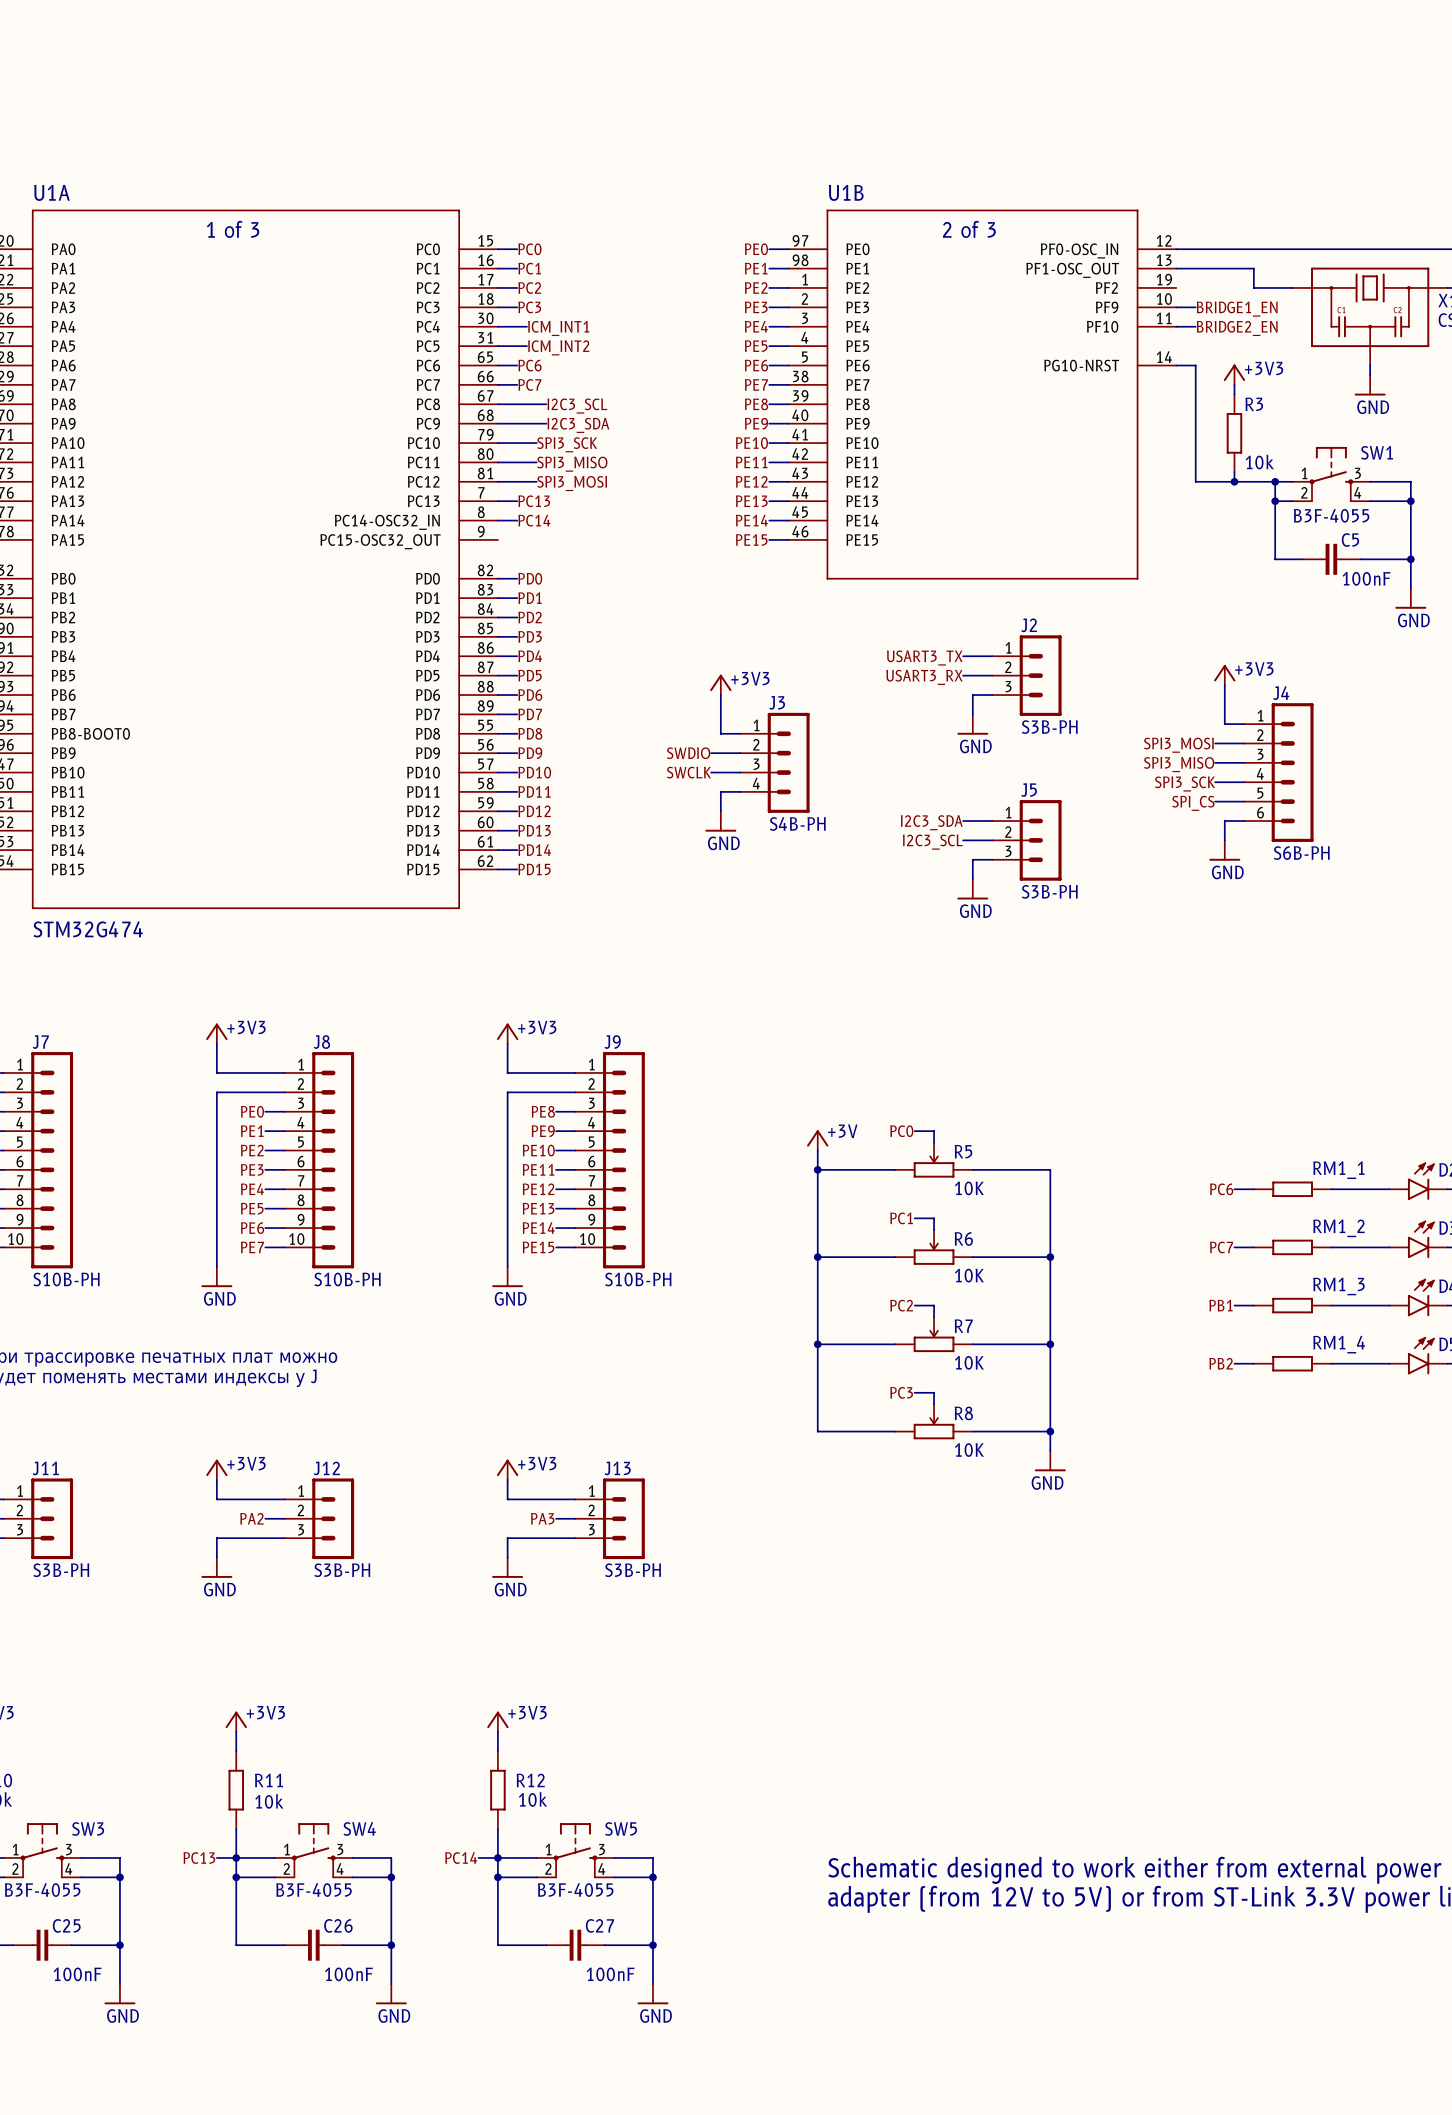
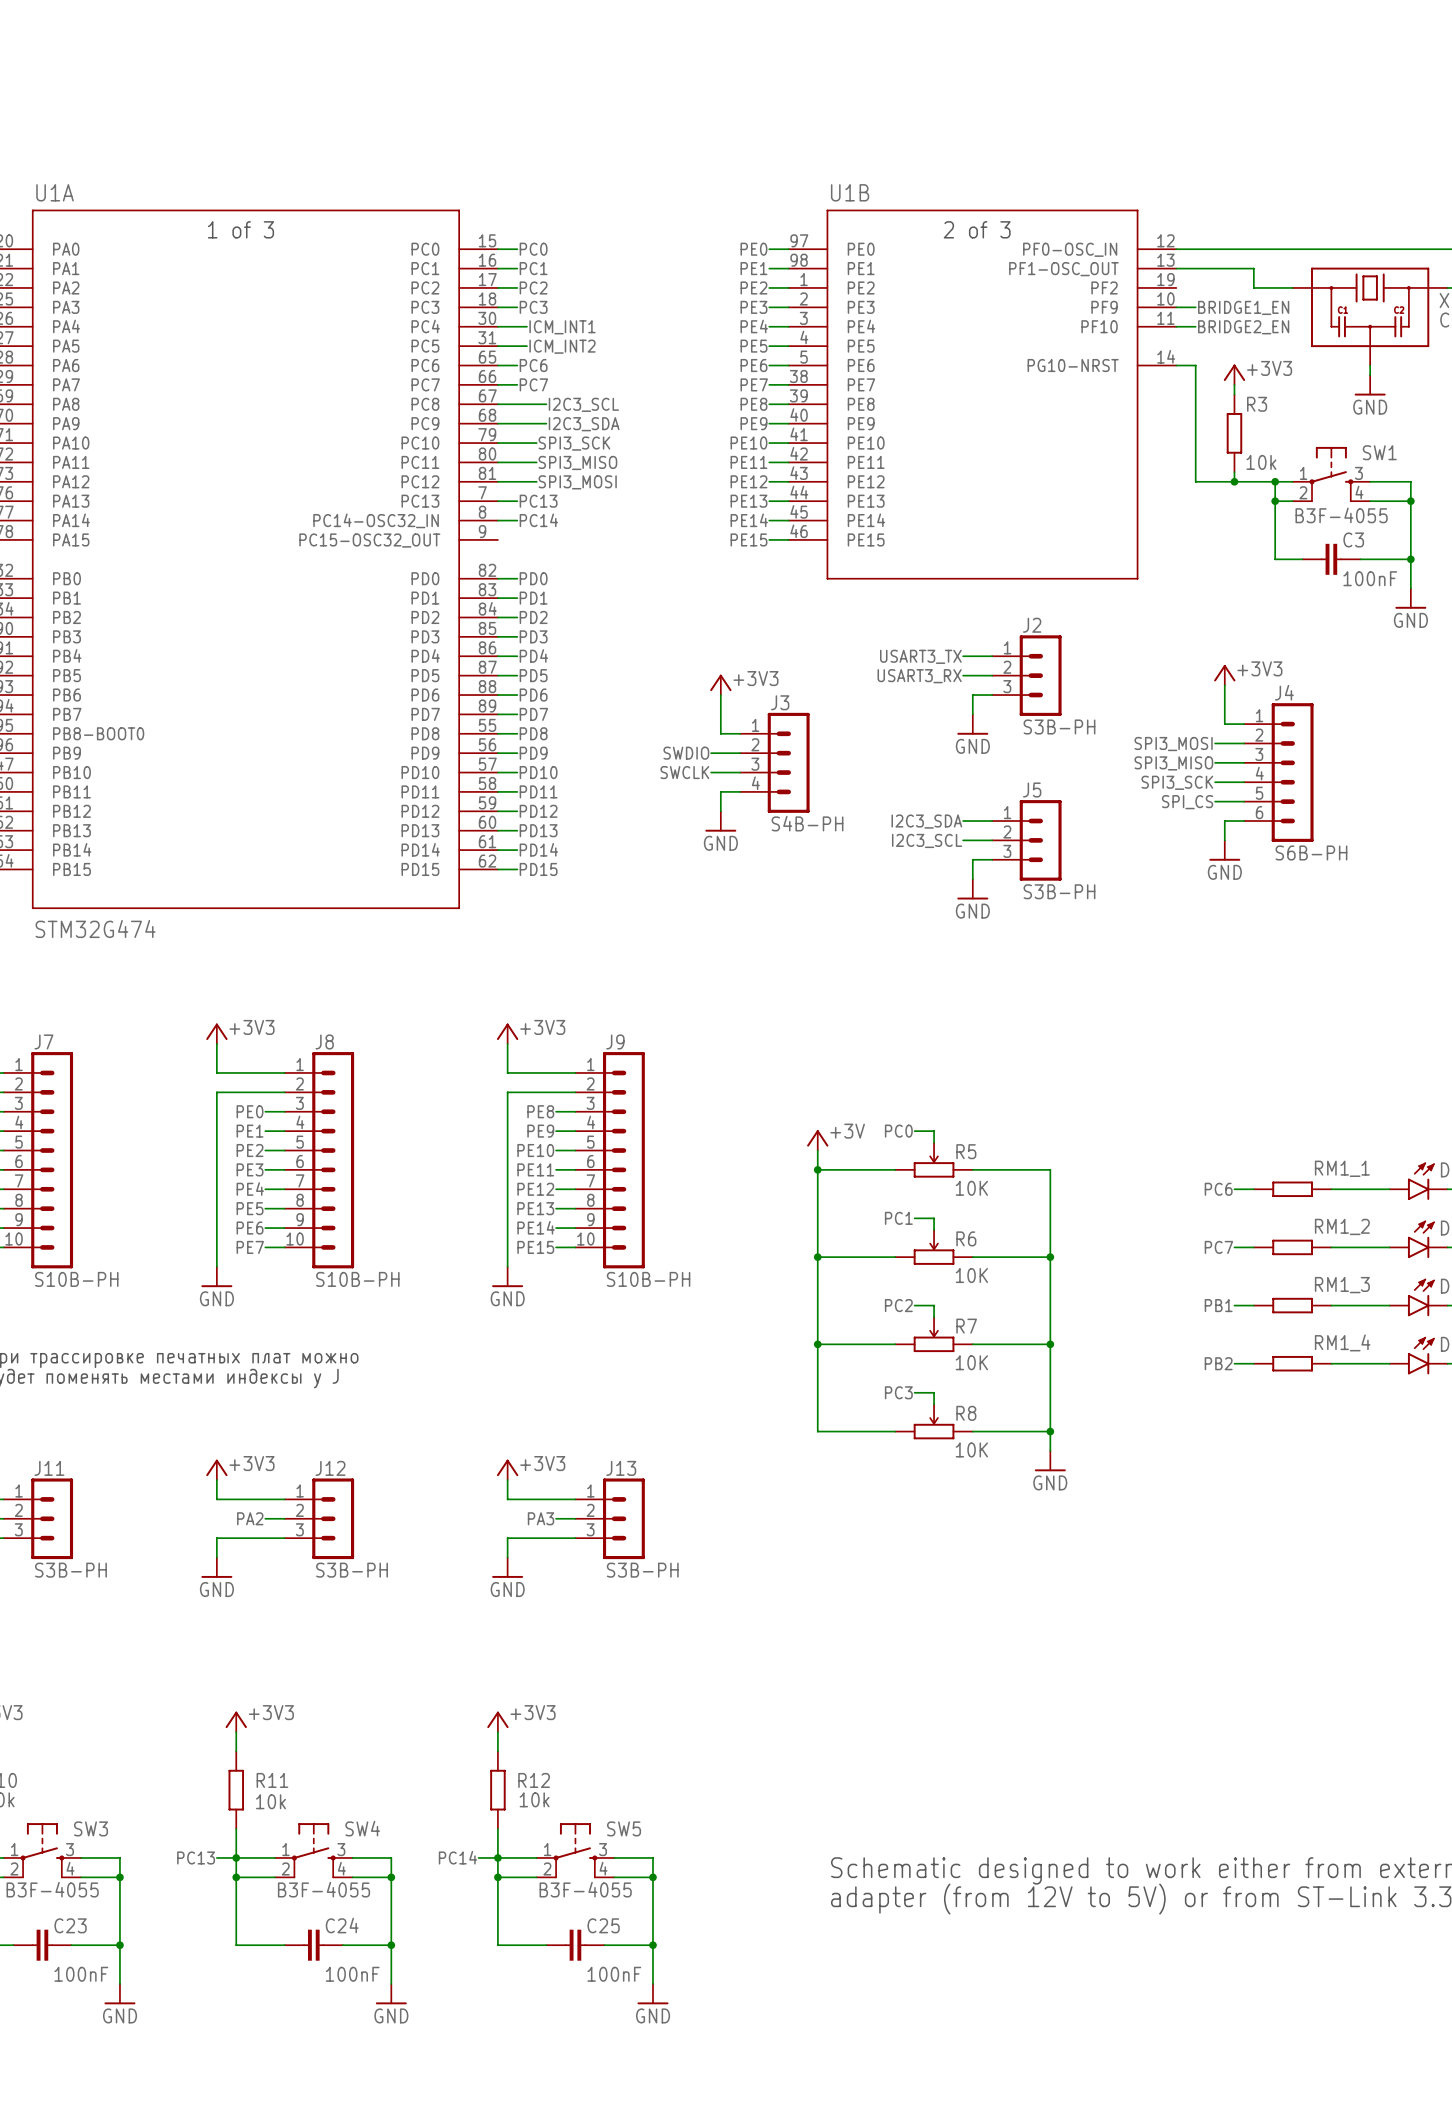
C5 name: C5 (1350, 540) -> C3 (1353, 539)
C25 name: C25 (66, 1925) -> C23 (70, 1925)
C26 name: C26 (338, 1925) -> C24 (342, 1925)
C27 name: C27 (599, 1925) -> C25 (603, 1925)

